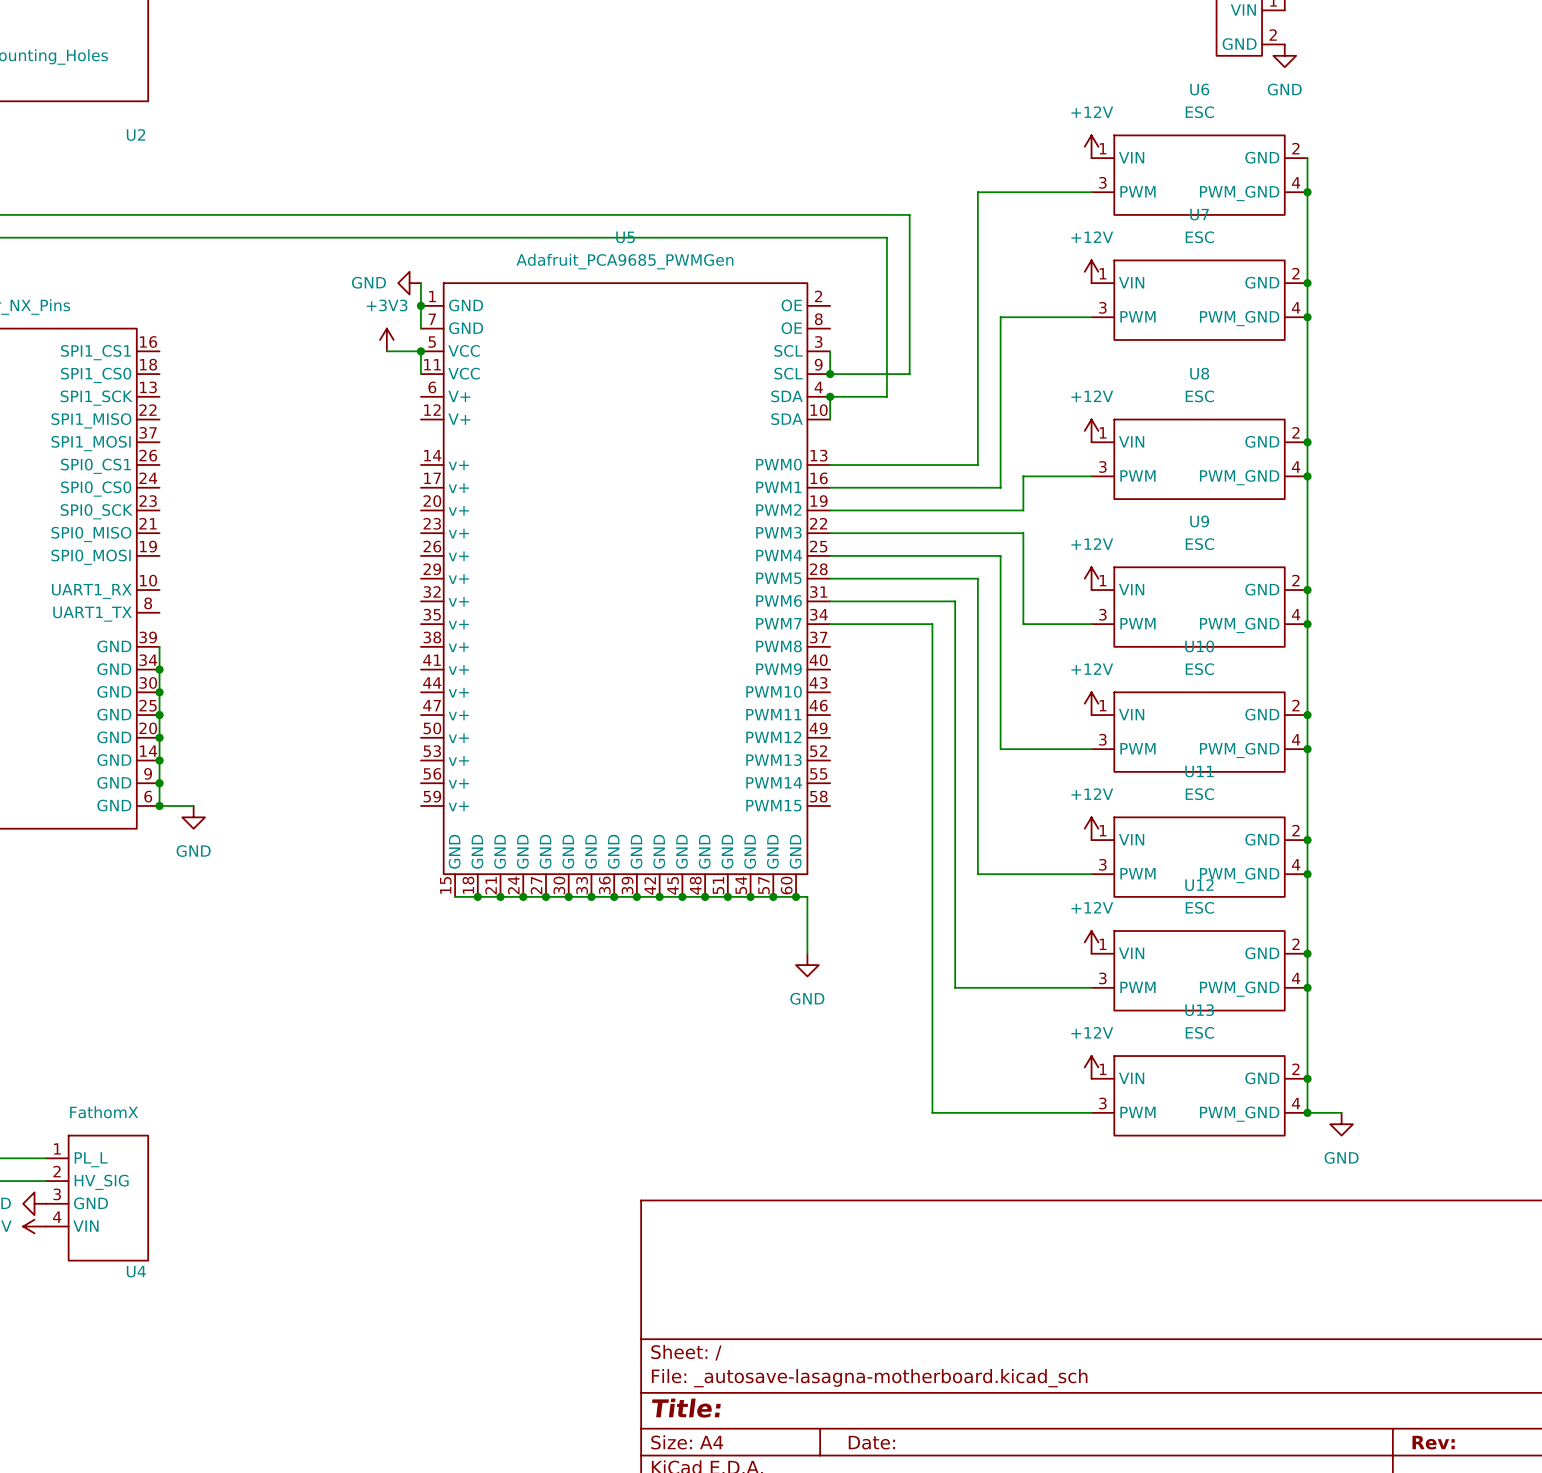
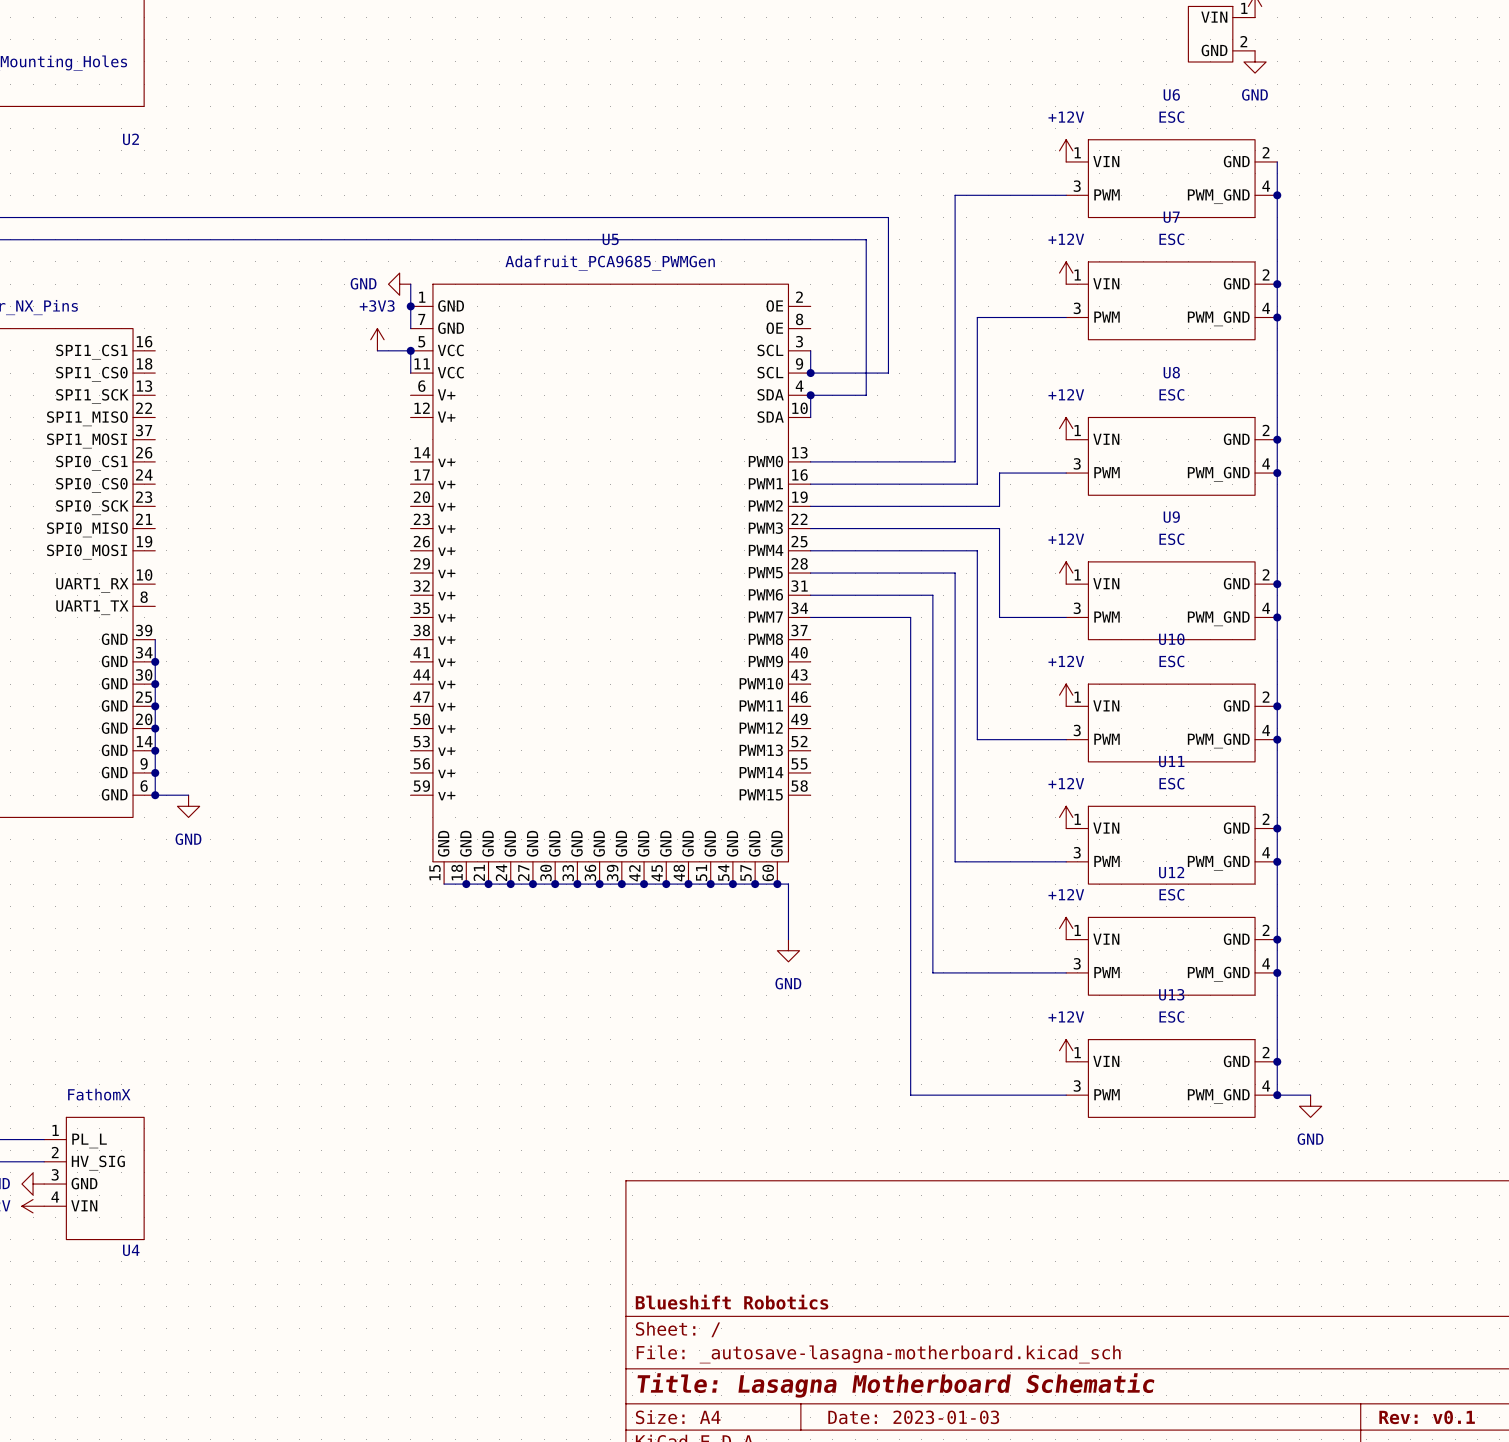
title block: none -> Blueshift Robotics (732, 1302)
title block: Title: (686, 1408) -> Title: Lasagna Motherboard Schematic (895, 1385)
title block: Date: (871, 1442) -> Date: 2023-01-03 (913, 1417)
title block: Rev: (1433, 1442) -> Rev: v0.1 (1427, 1417)

